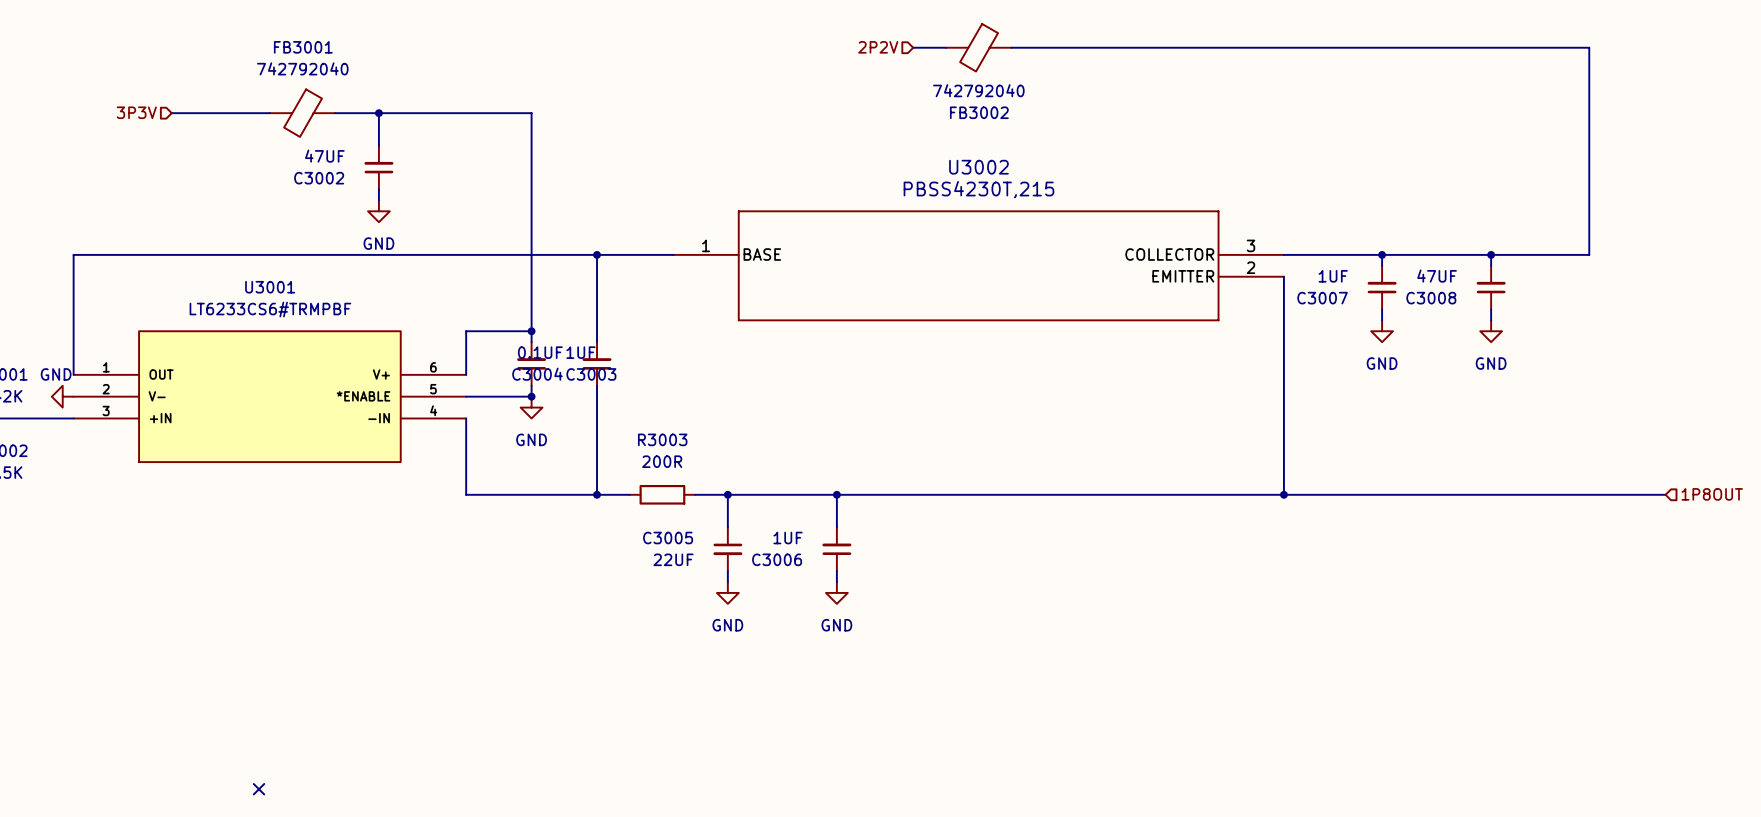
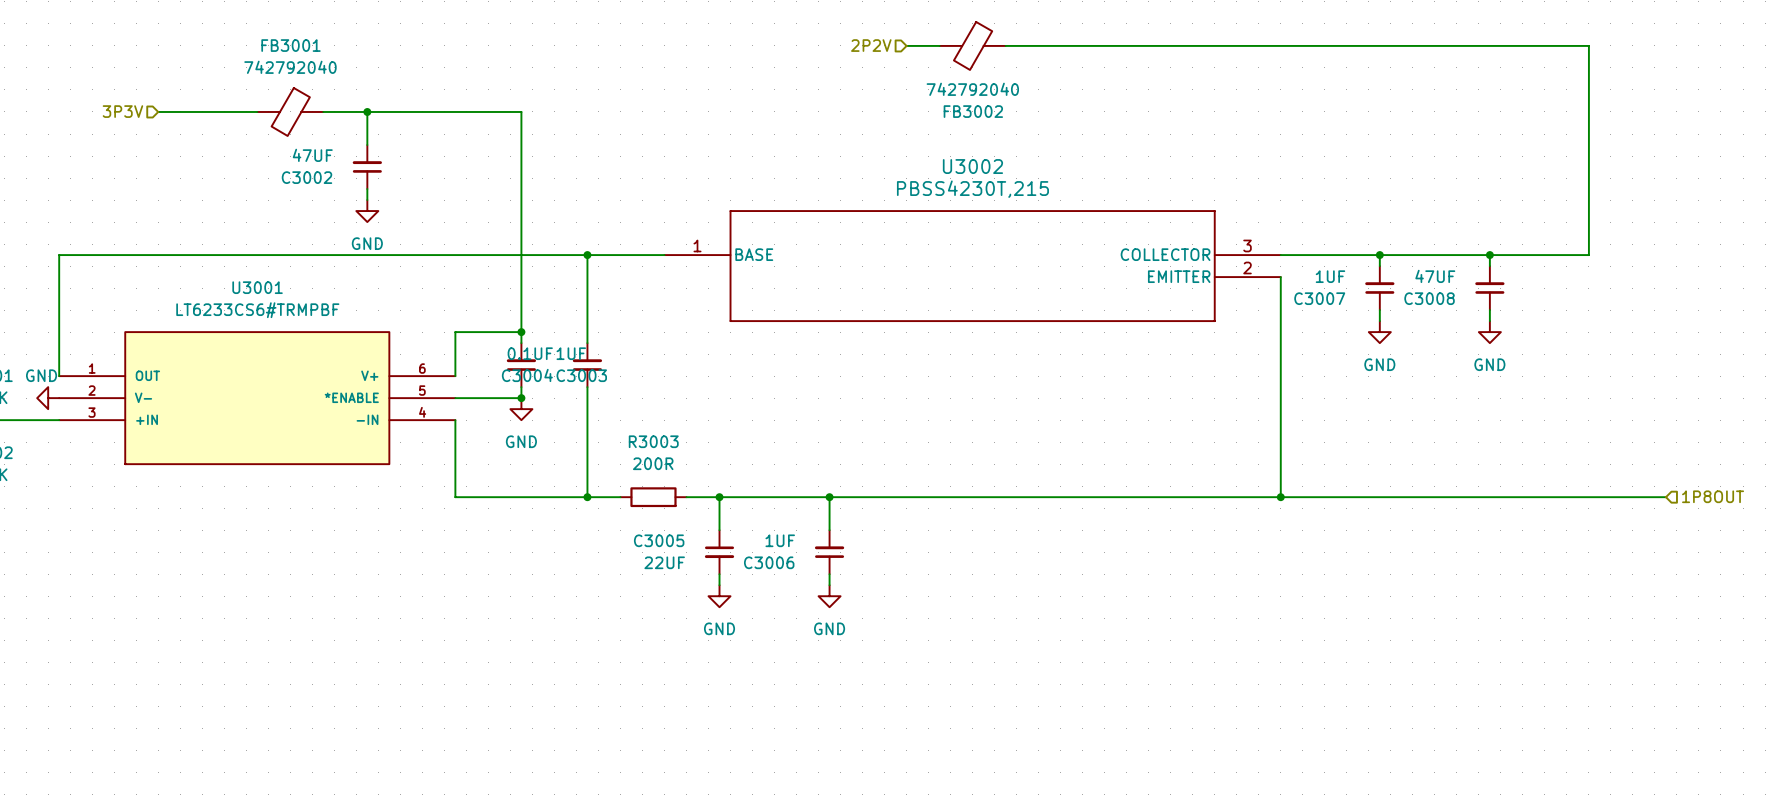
no-connect mark: (258, 789) -> none

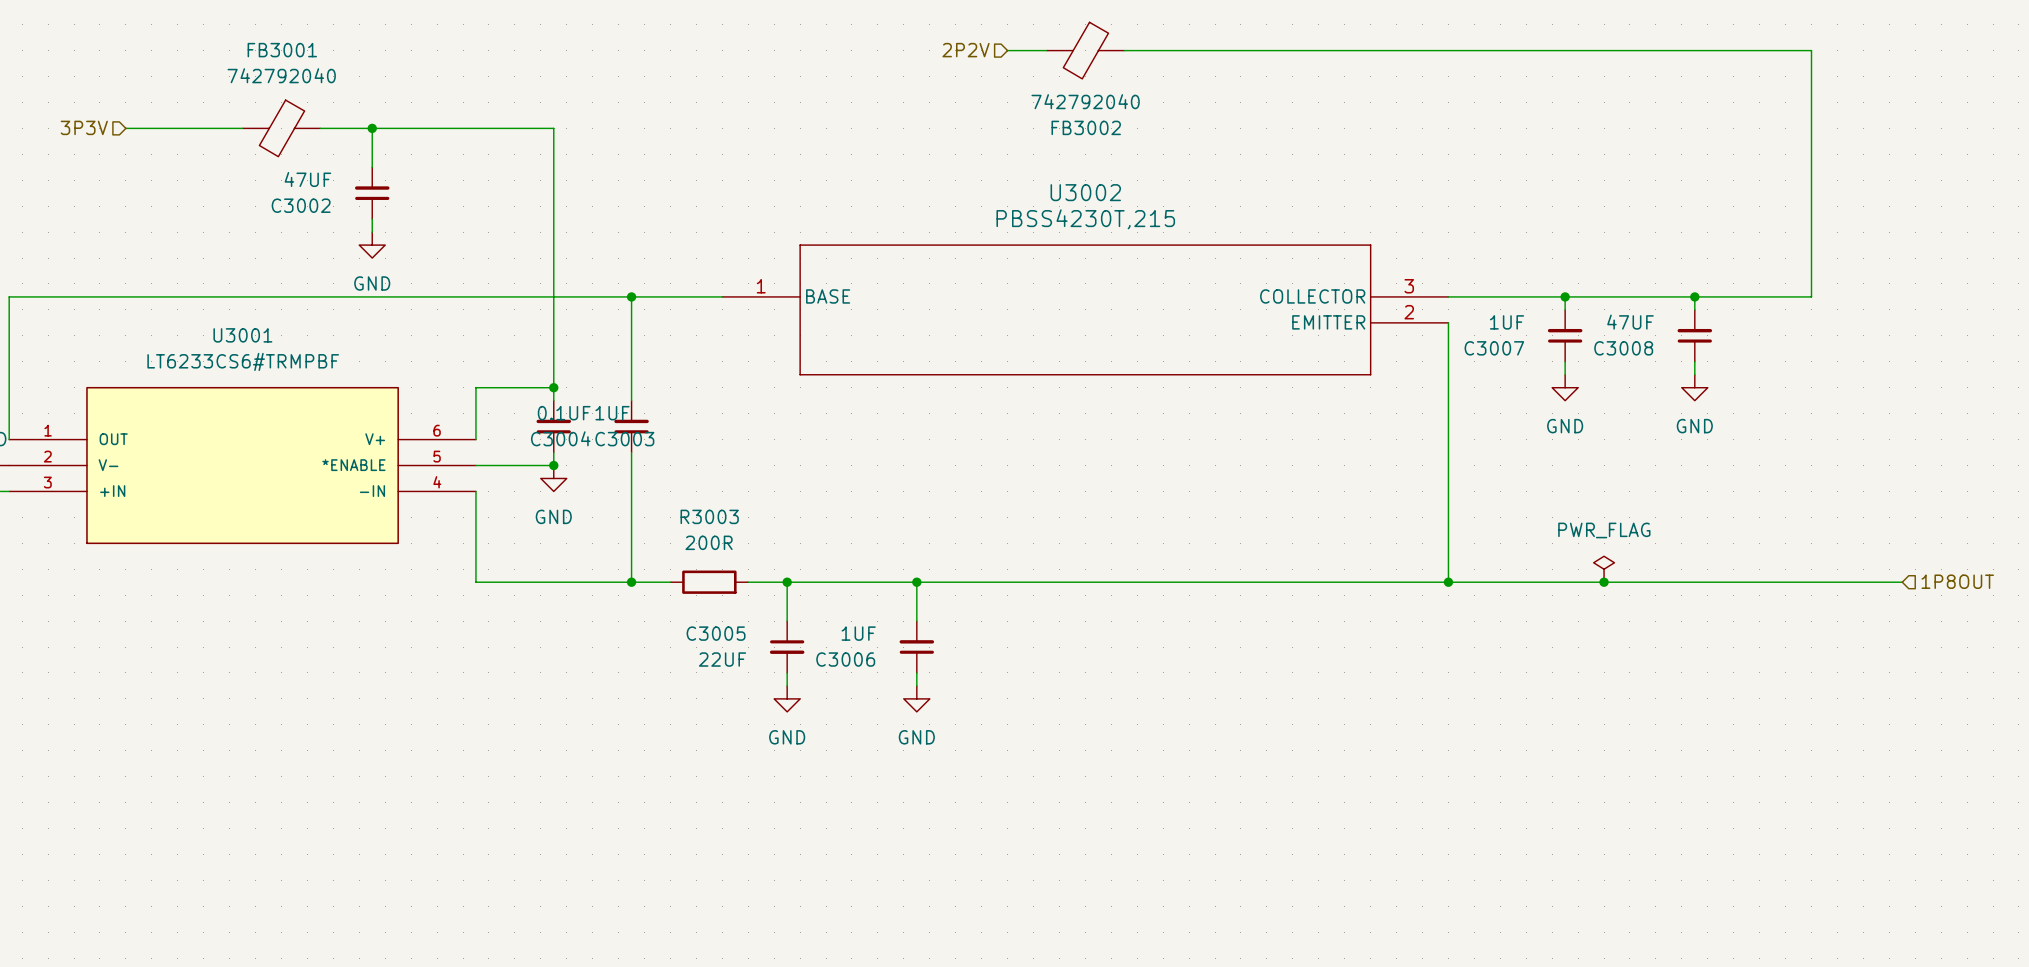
power symbol: none -> PWR_FLAG (1604, 569)
junction: none -> (1604, 582)

